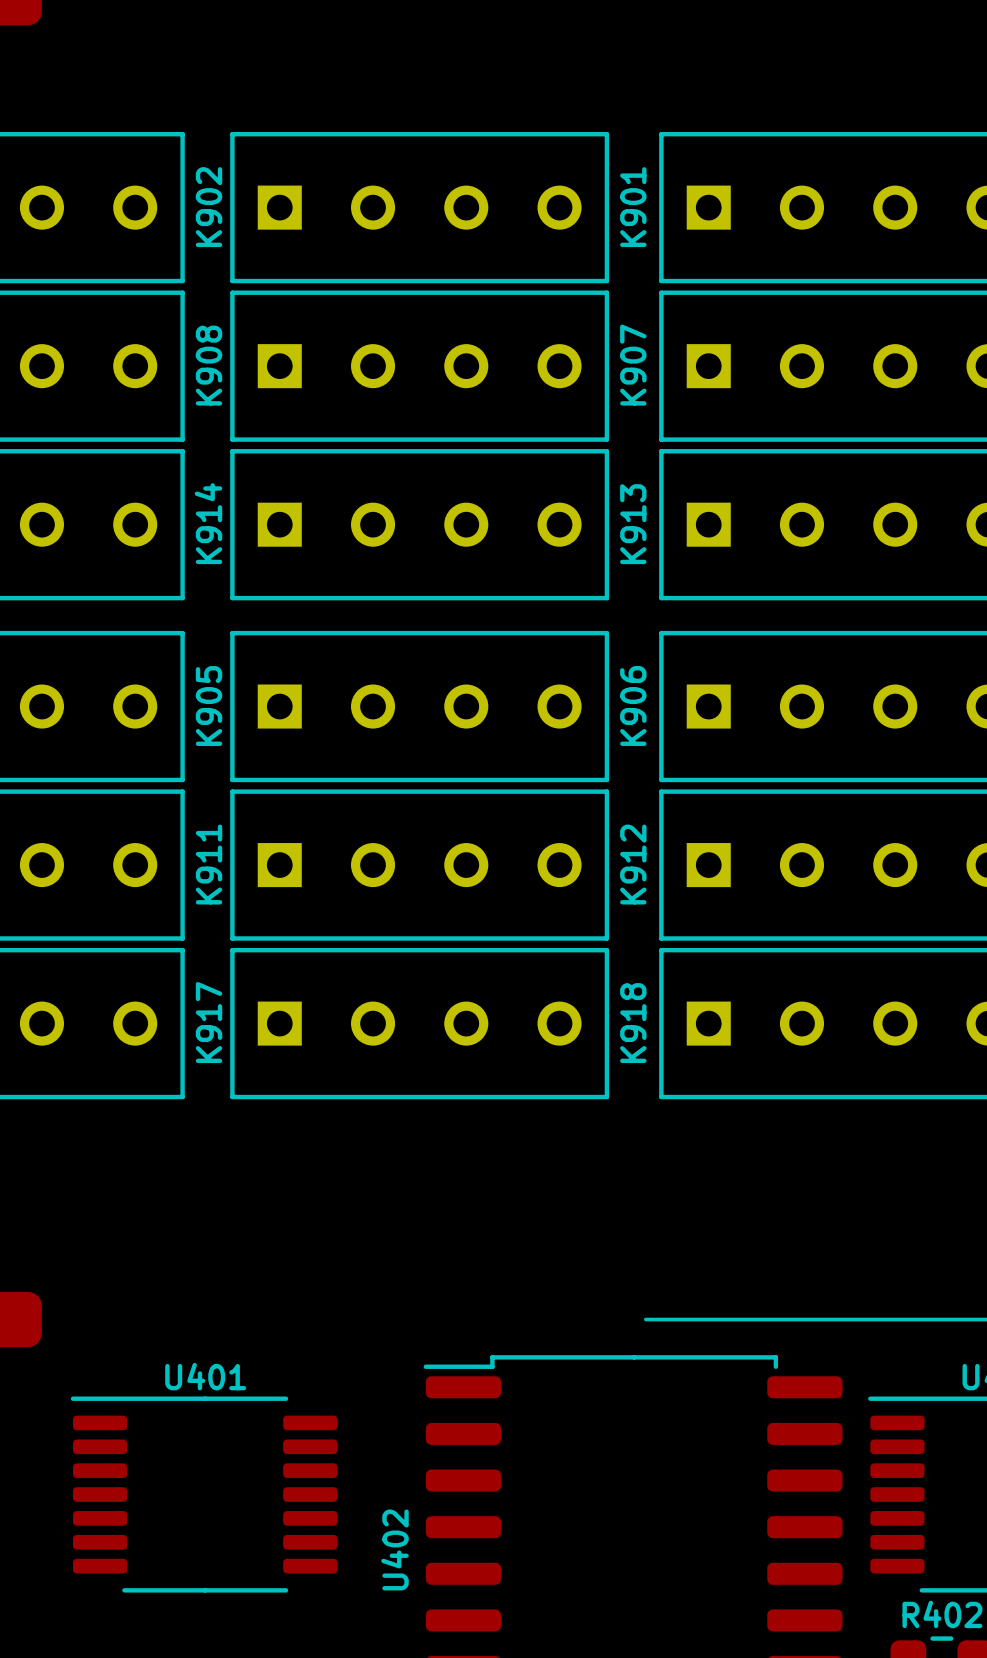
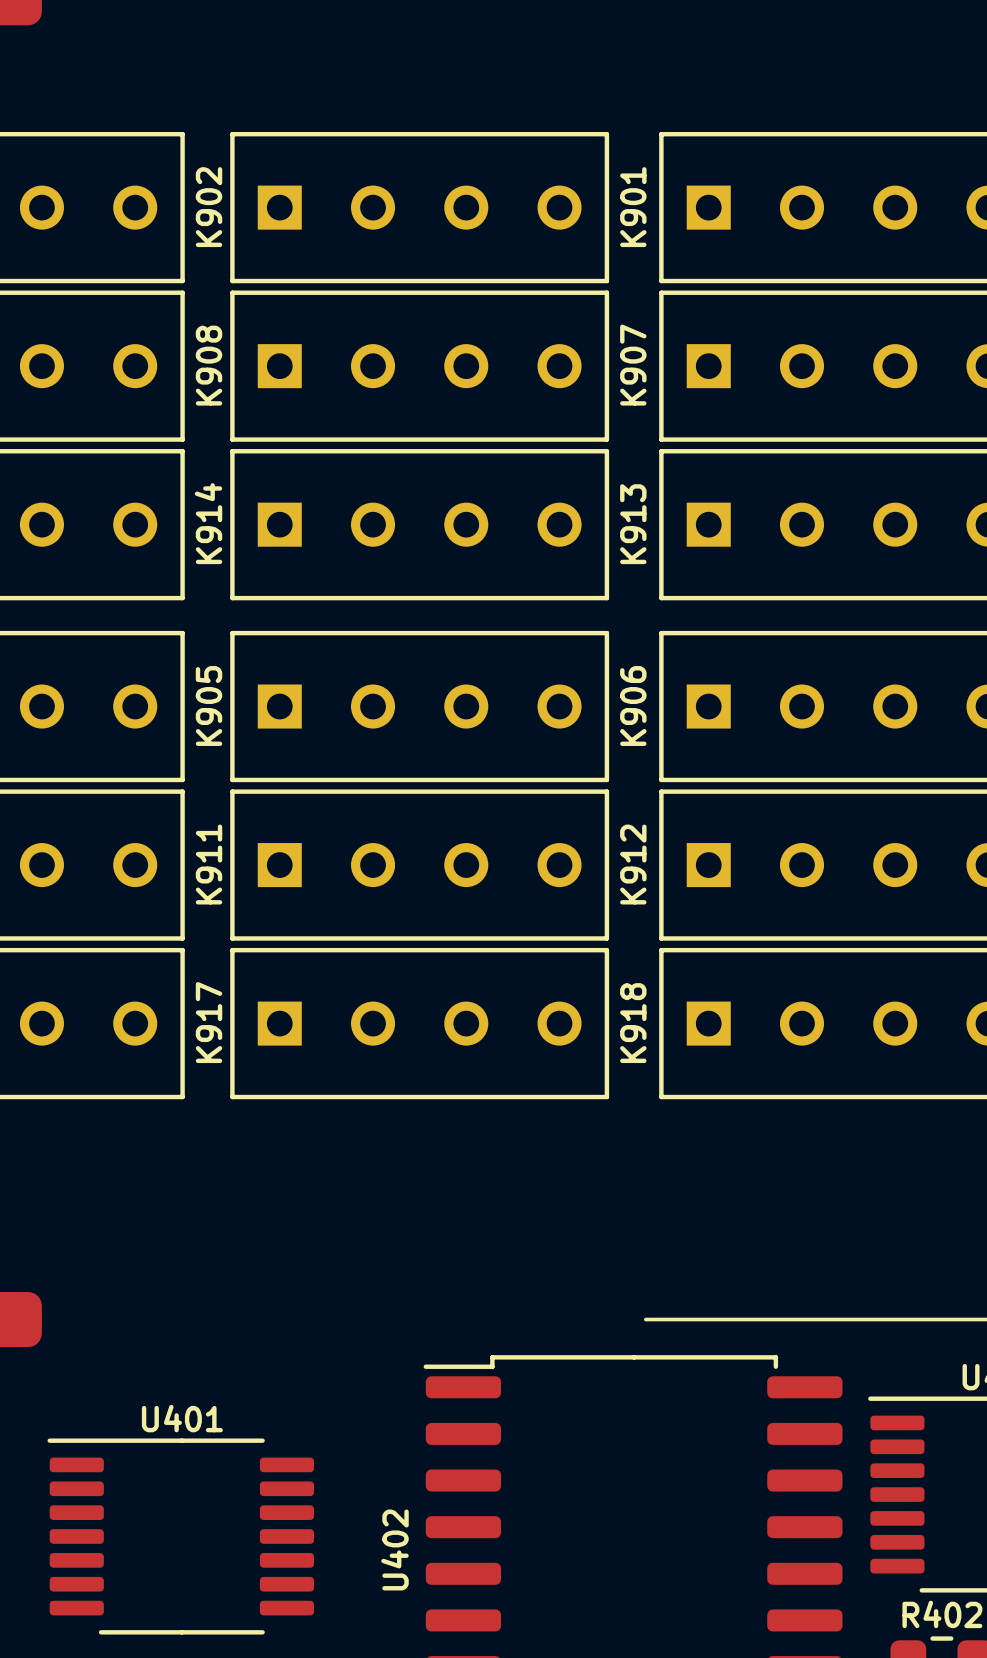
U401 position: (204, 1494) -> (180, 1536)

